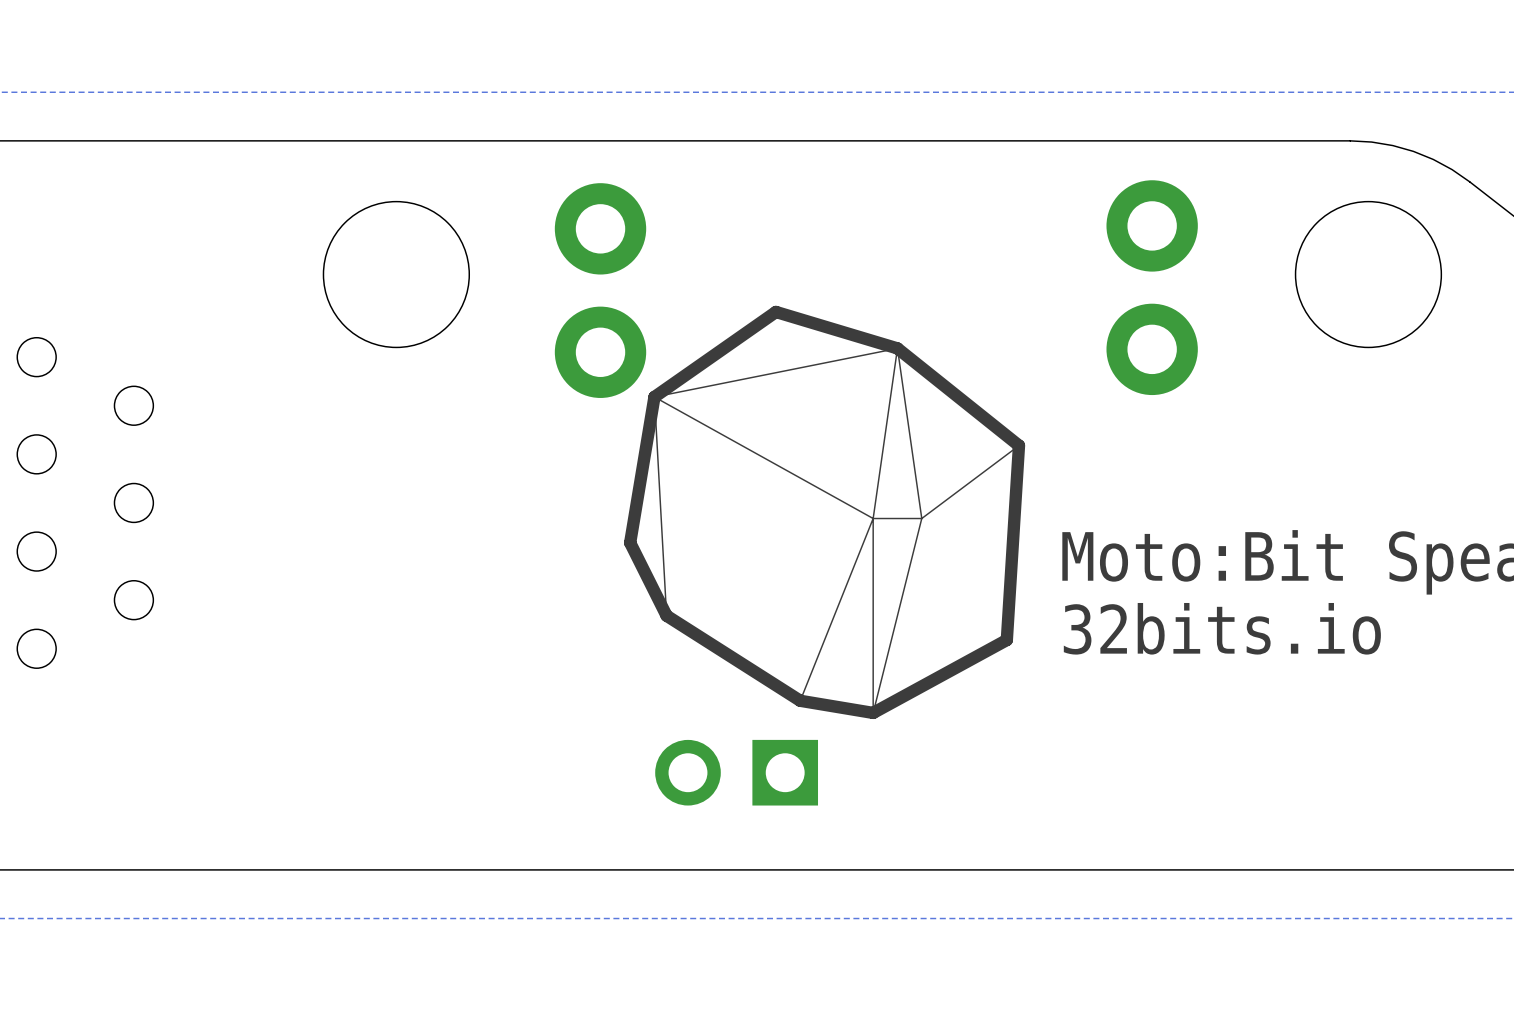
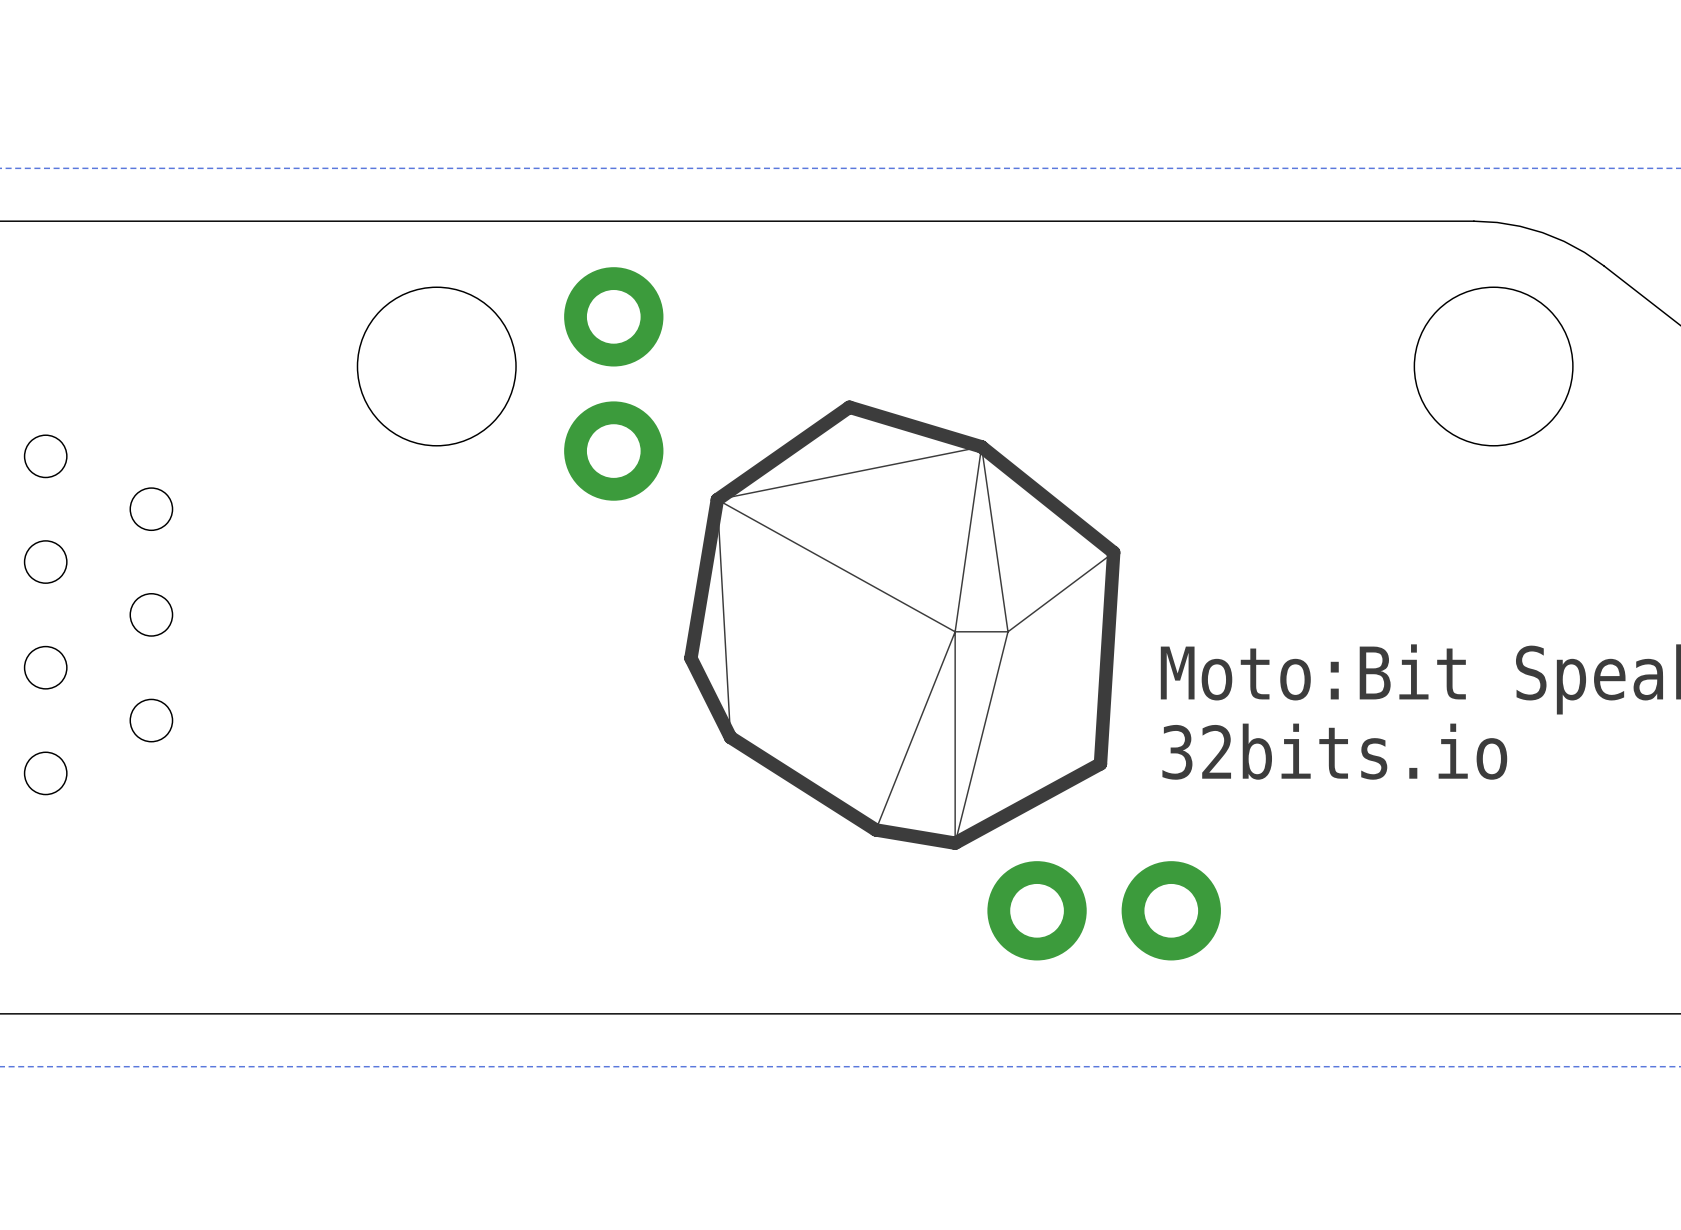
part rotation: 0° (1152, 287) -> 90° clockwise (1104, 910)
part position: (1152, 287) -> (1104, 910)
part position: (600, 290) -> (613, 383)
part: (736, 772) -> none

